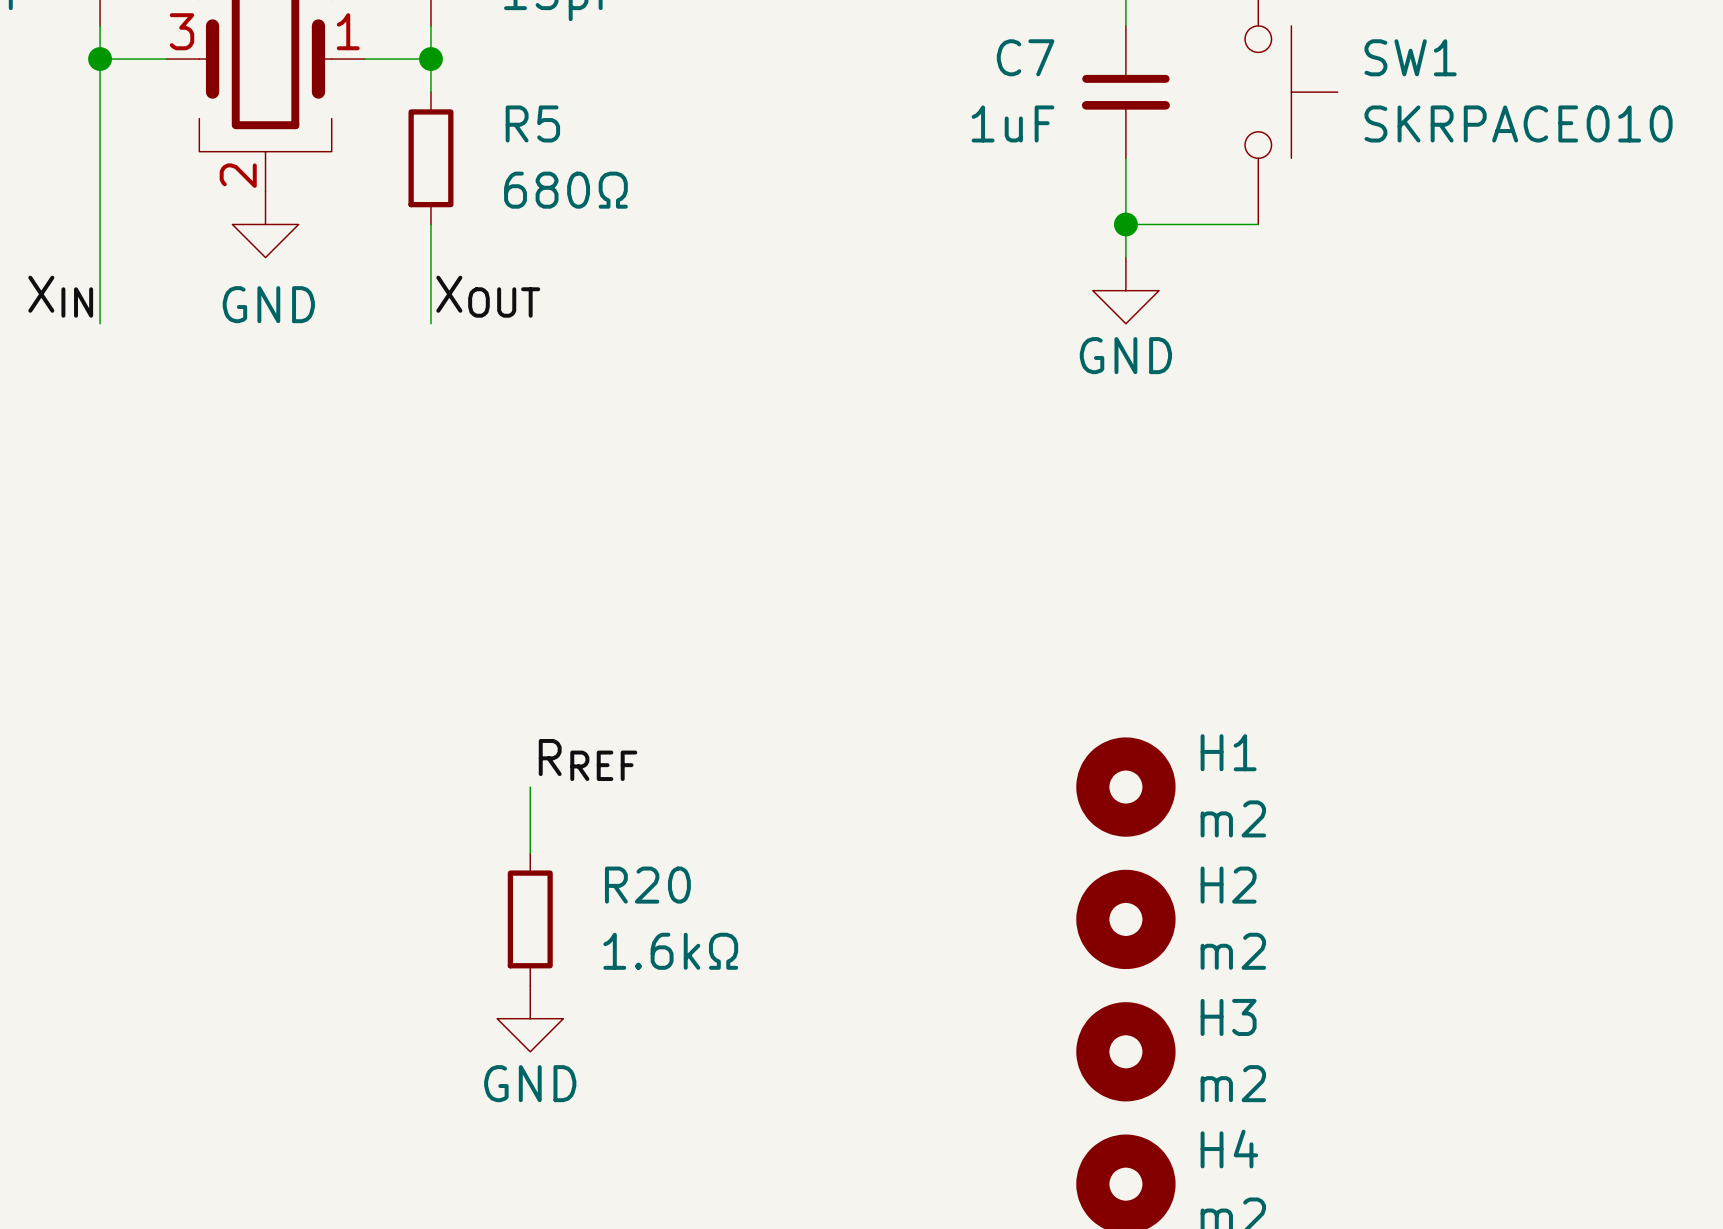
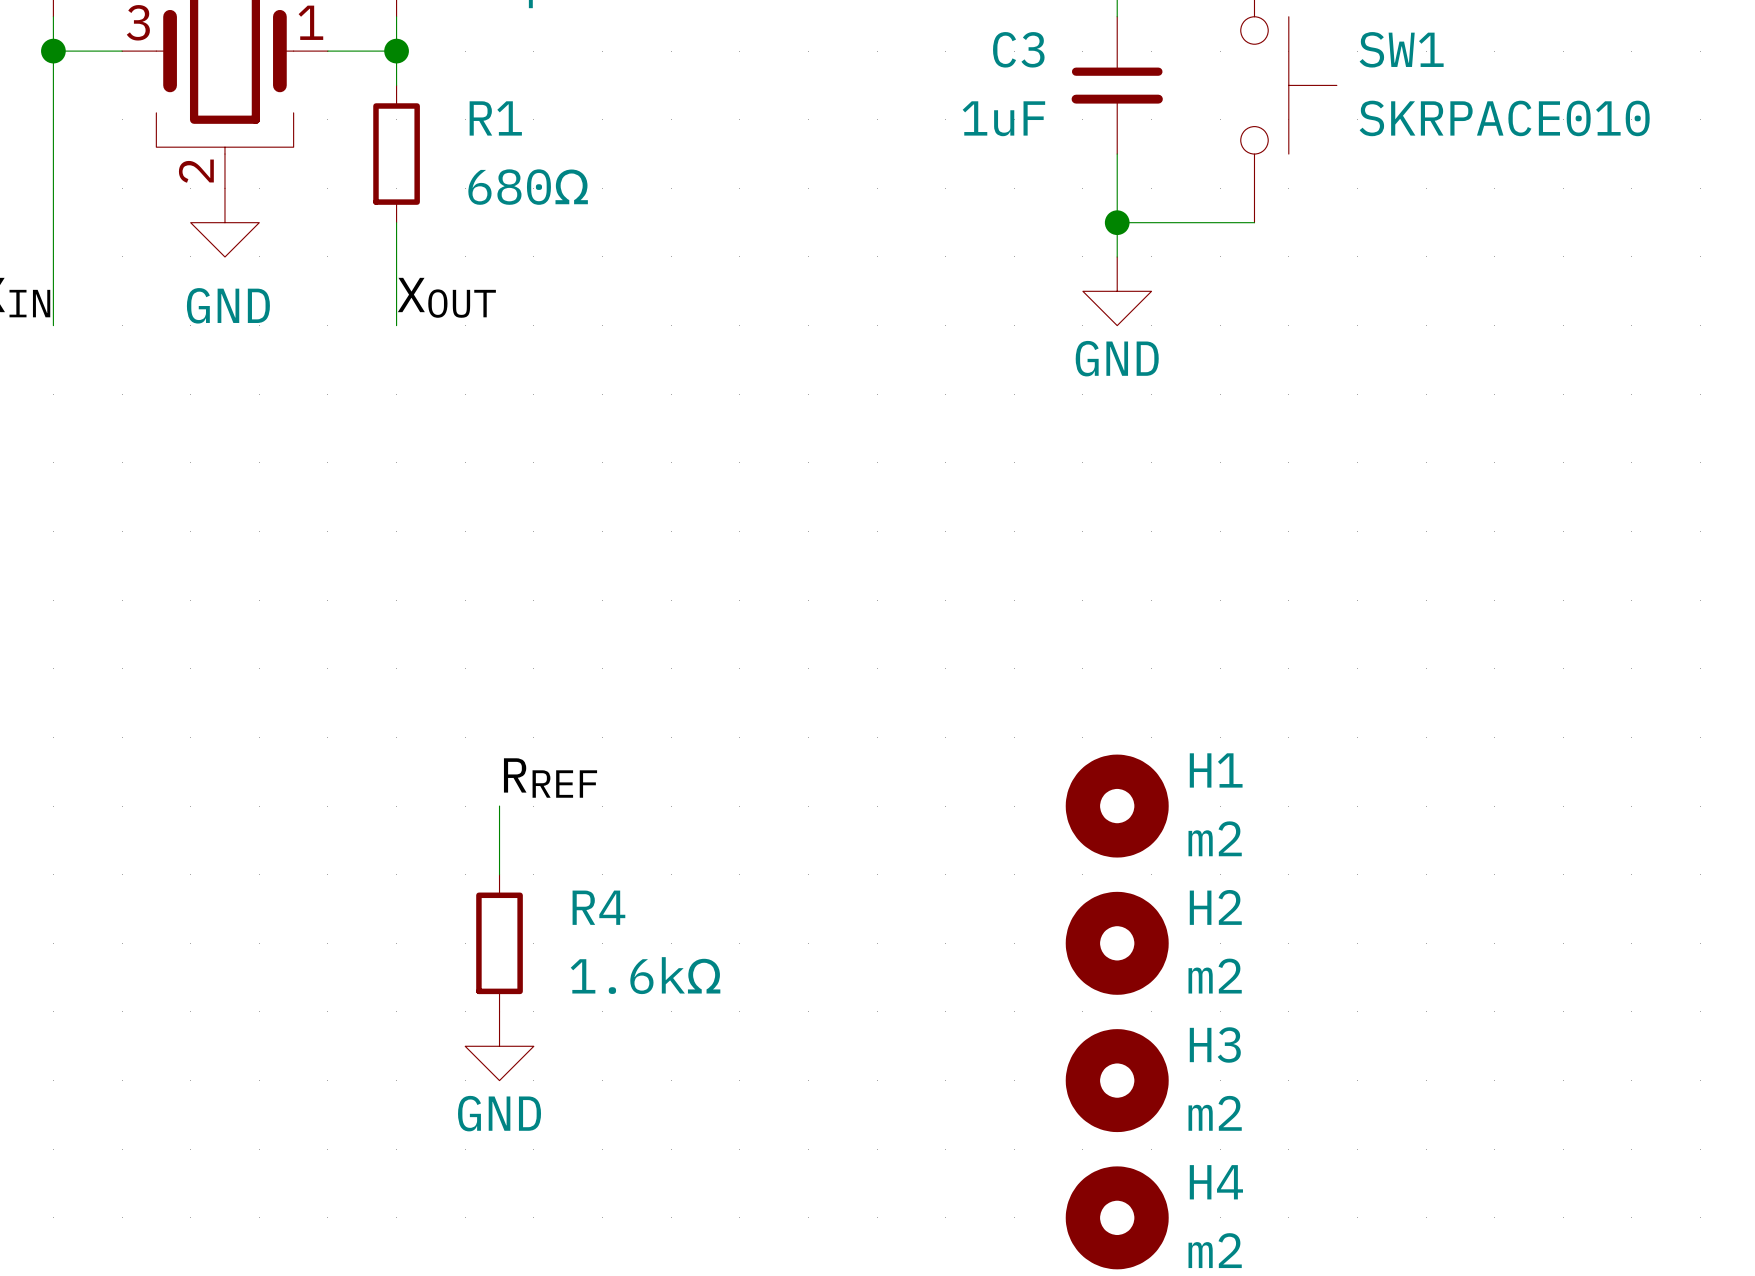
C7 name: C7 (1025, 57) -> C3 (1018, 49)
R5 name: R5 (532, 123) -> R1 (495, 118)
R20 name: R20 (647, 885) -> R4 (598, 907)

